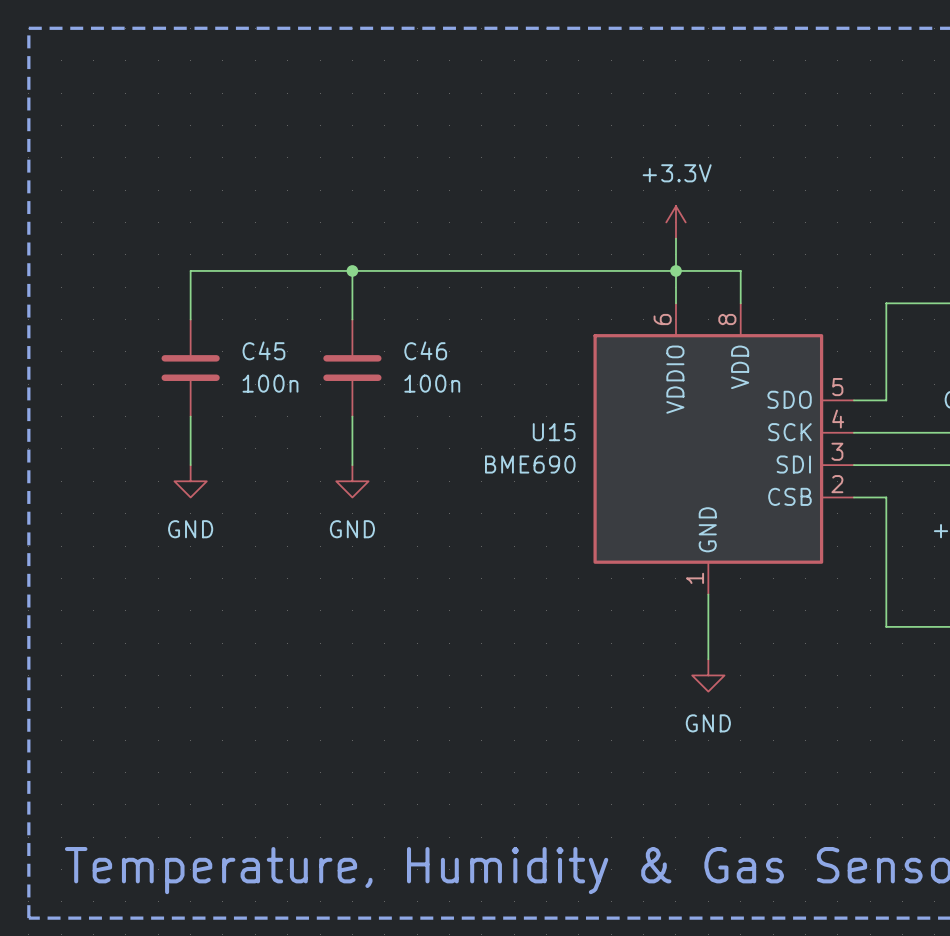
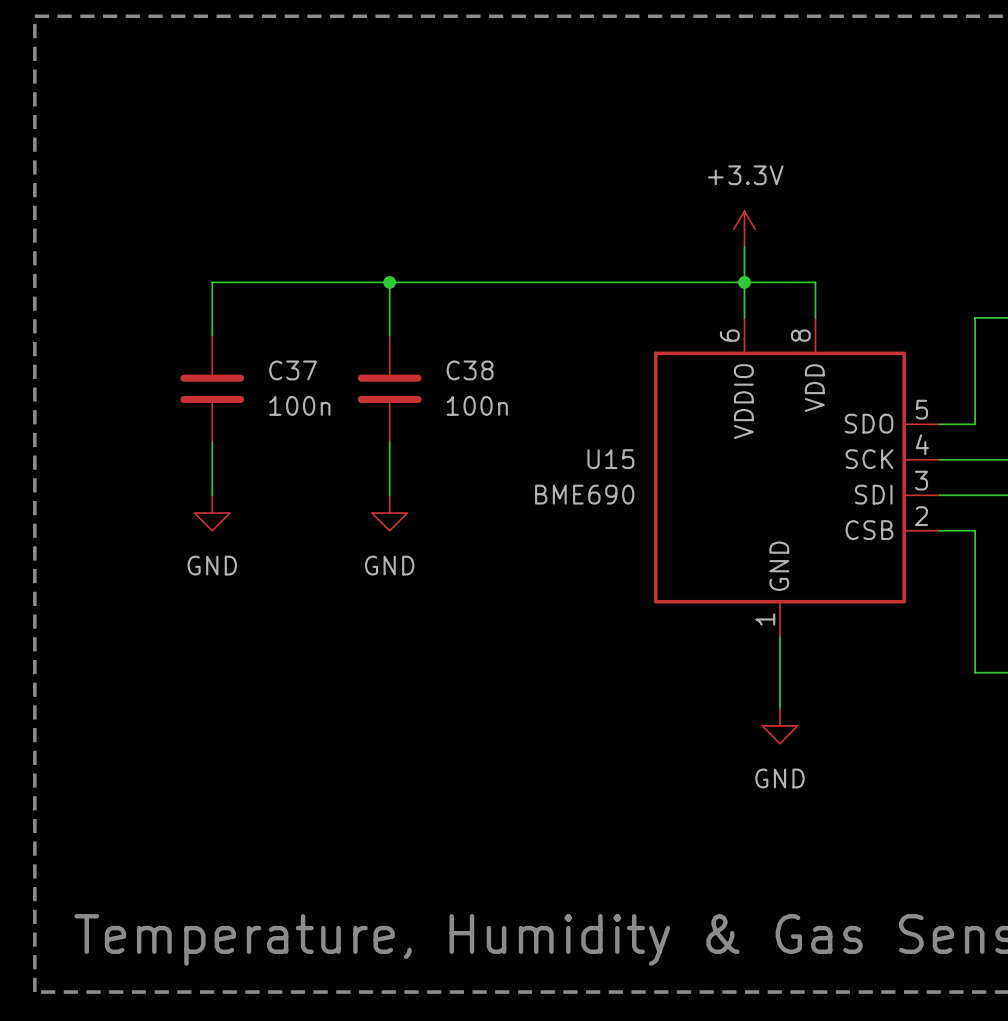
C45 name: C45 (263, 350) -> C37 (293, 370)
C46 name: C46 (425, 350) -> C38 (470, 370)

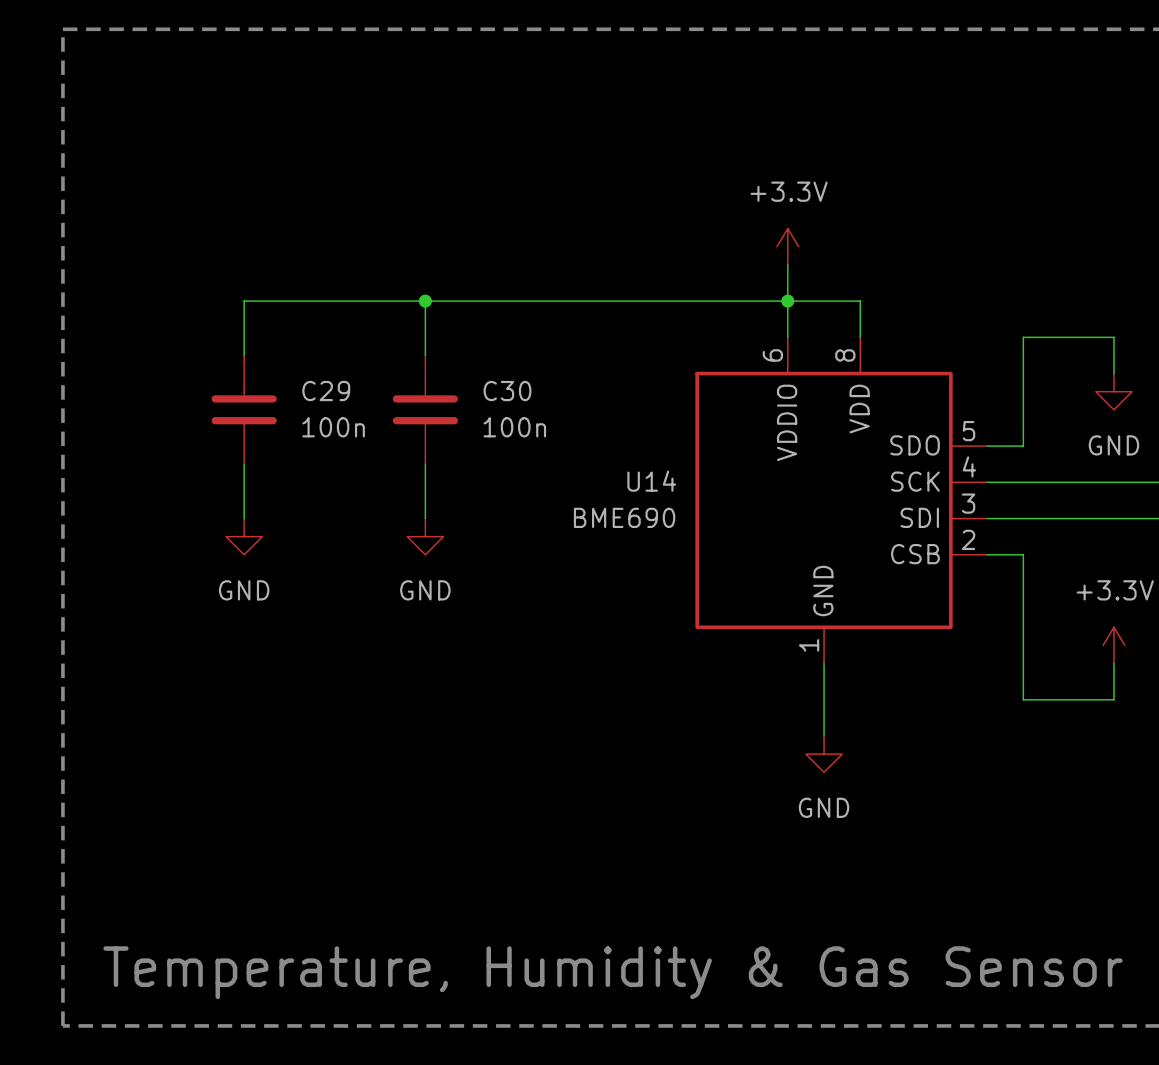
C37 name: C37 (293, 370) -> C29 (326, 391)
C38 name: C38 (470, 370) -> C30 (507, 391)
U15 name: U15 (610, 459) -> U14 (651, 481)

